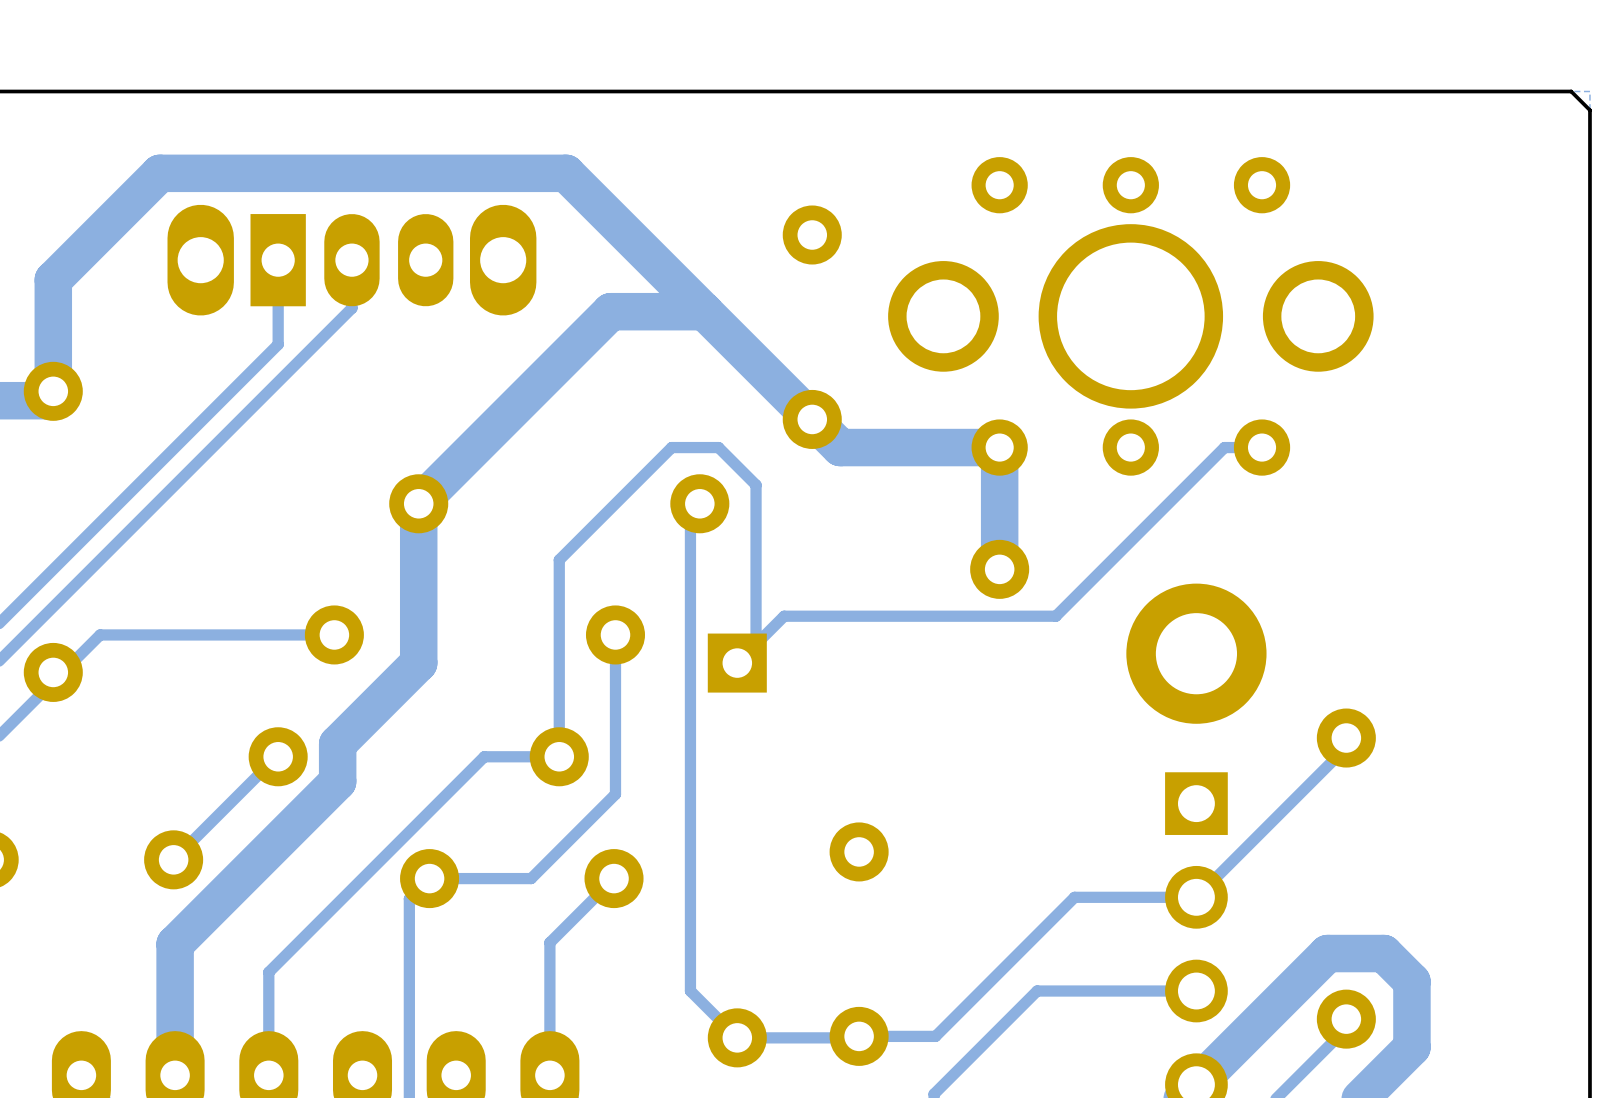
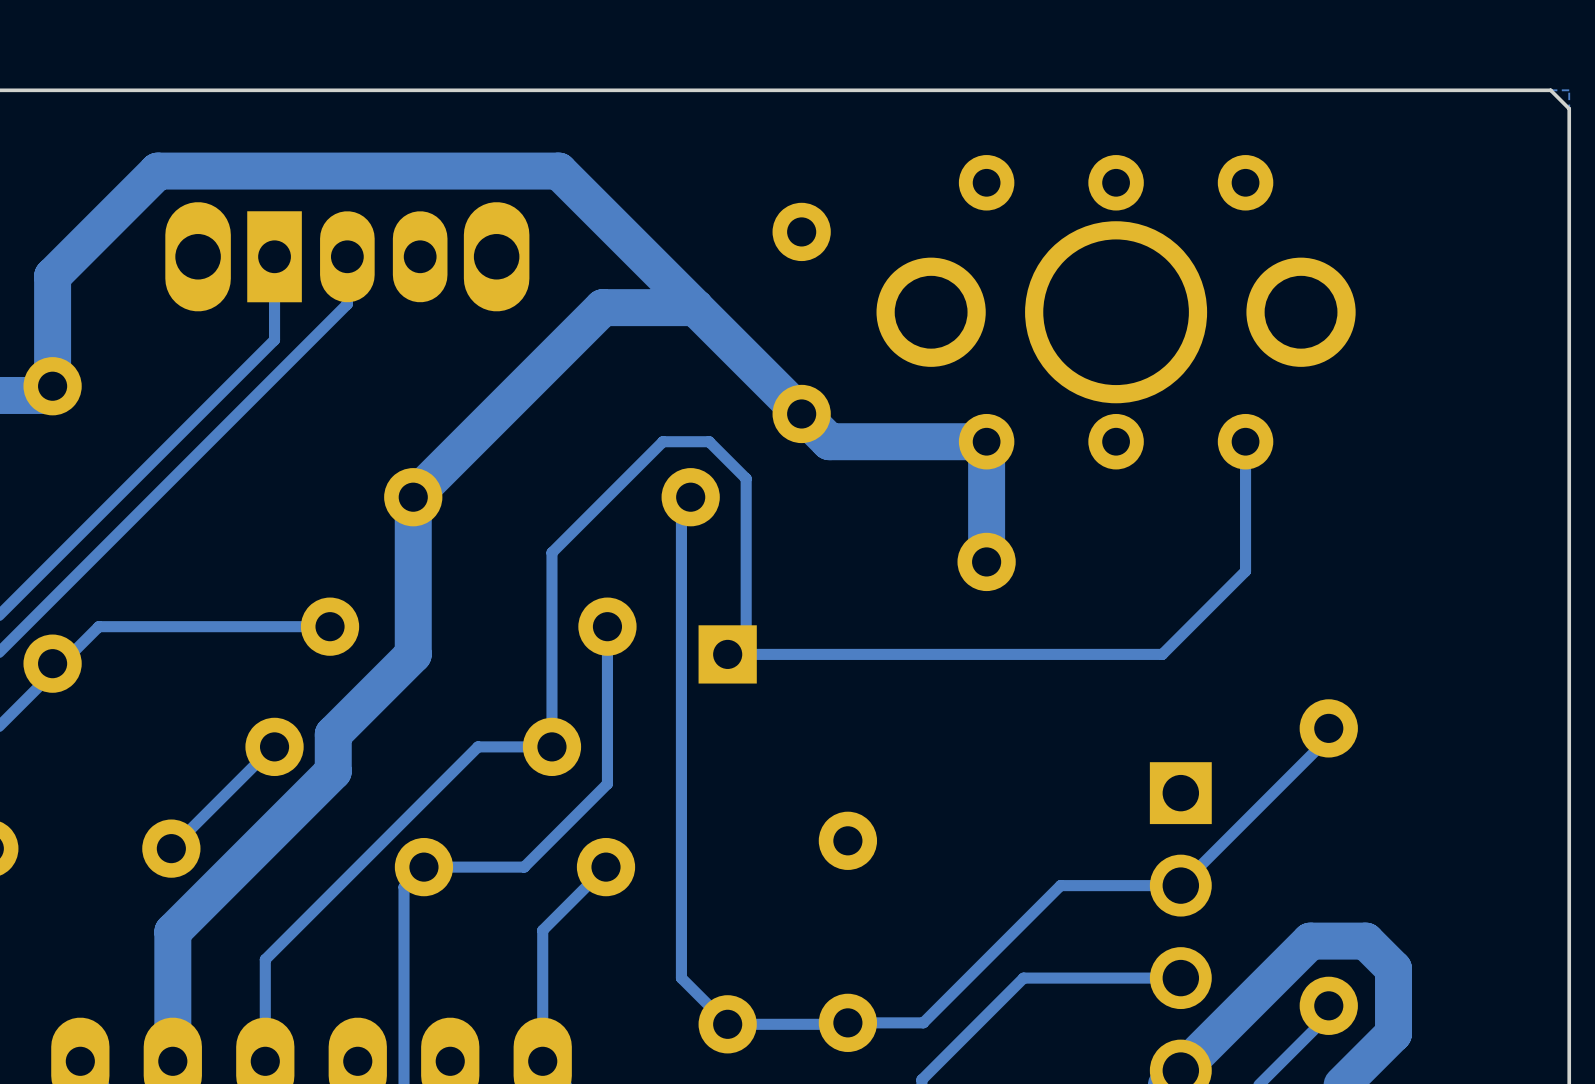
track: (1262, 447) (1224, 447) (1055, 616) (784, 616) (756, 644) -> (1245, 441) (1245, 571) (1162, 654) (727, 654)
part: (1196, 653) -> none

